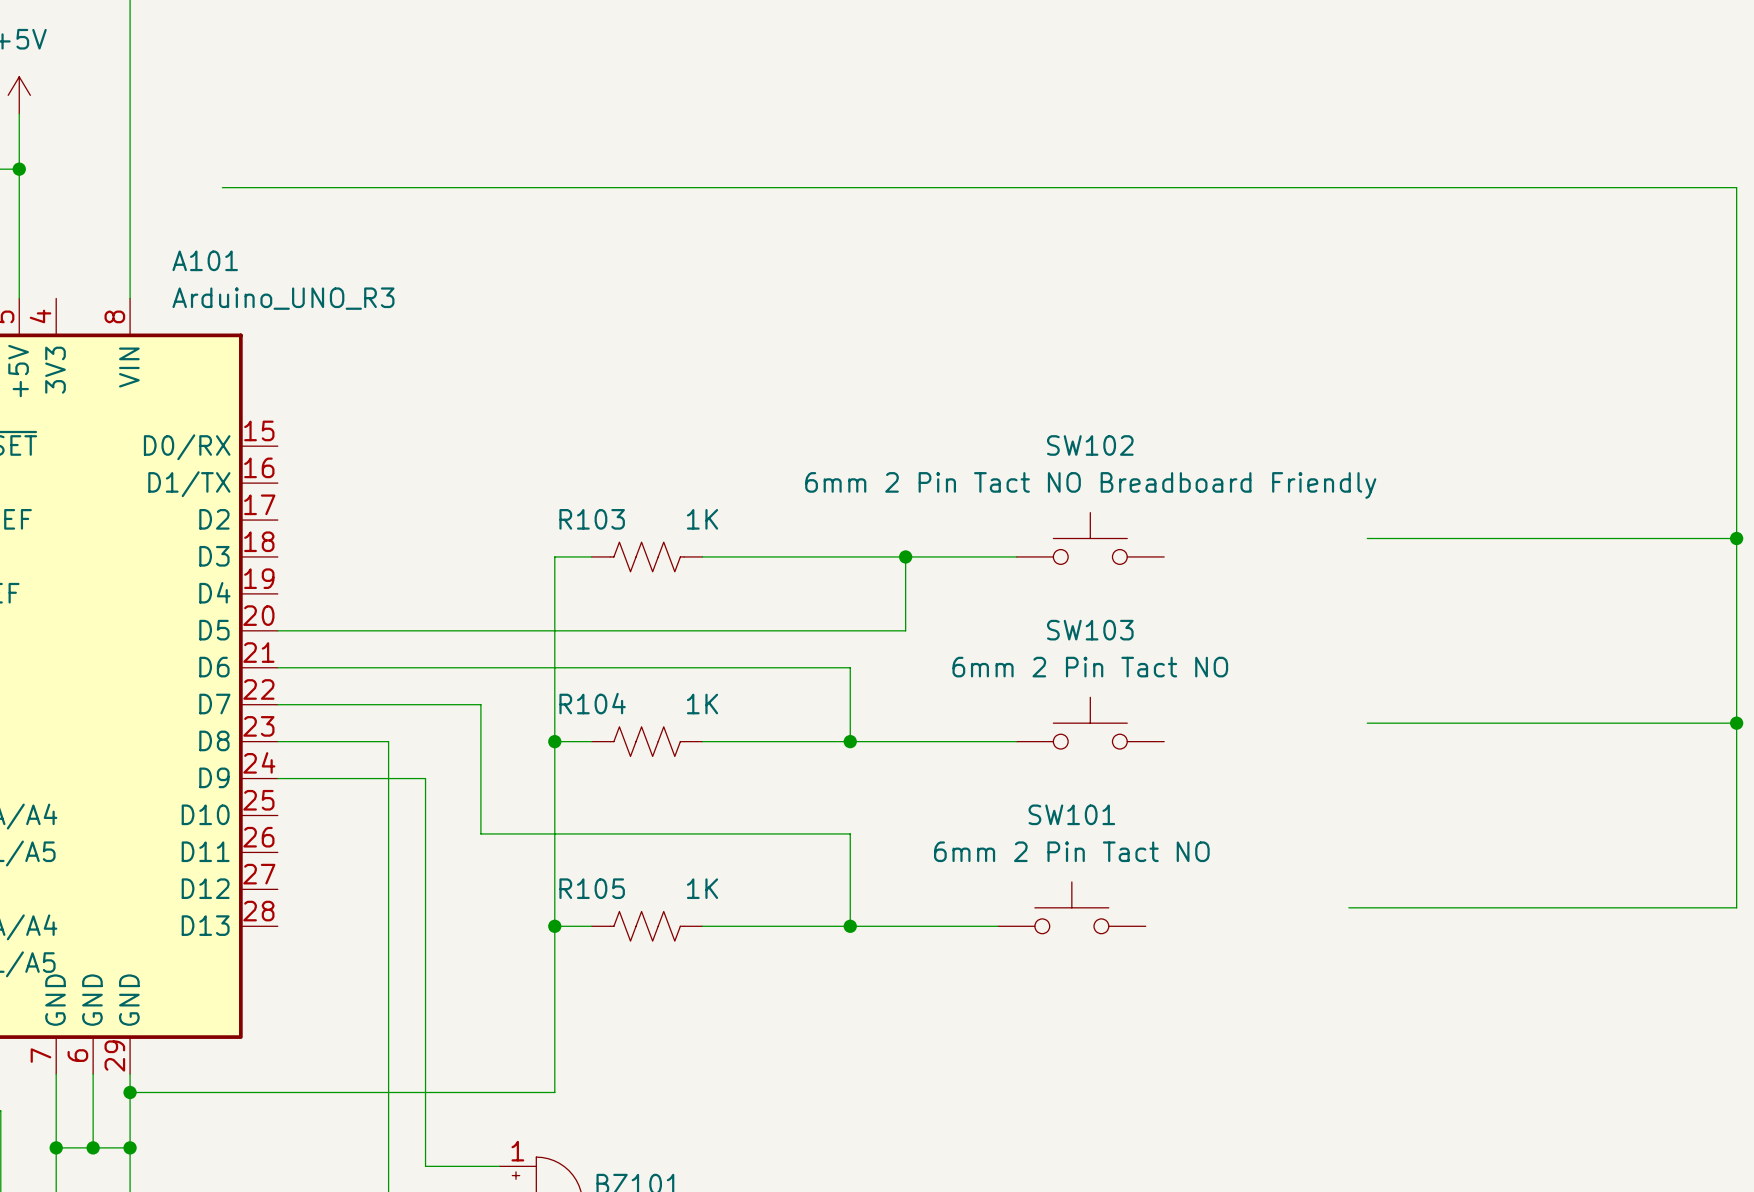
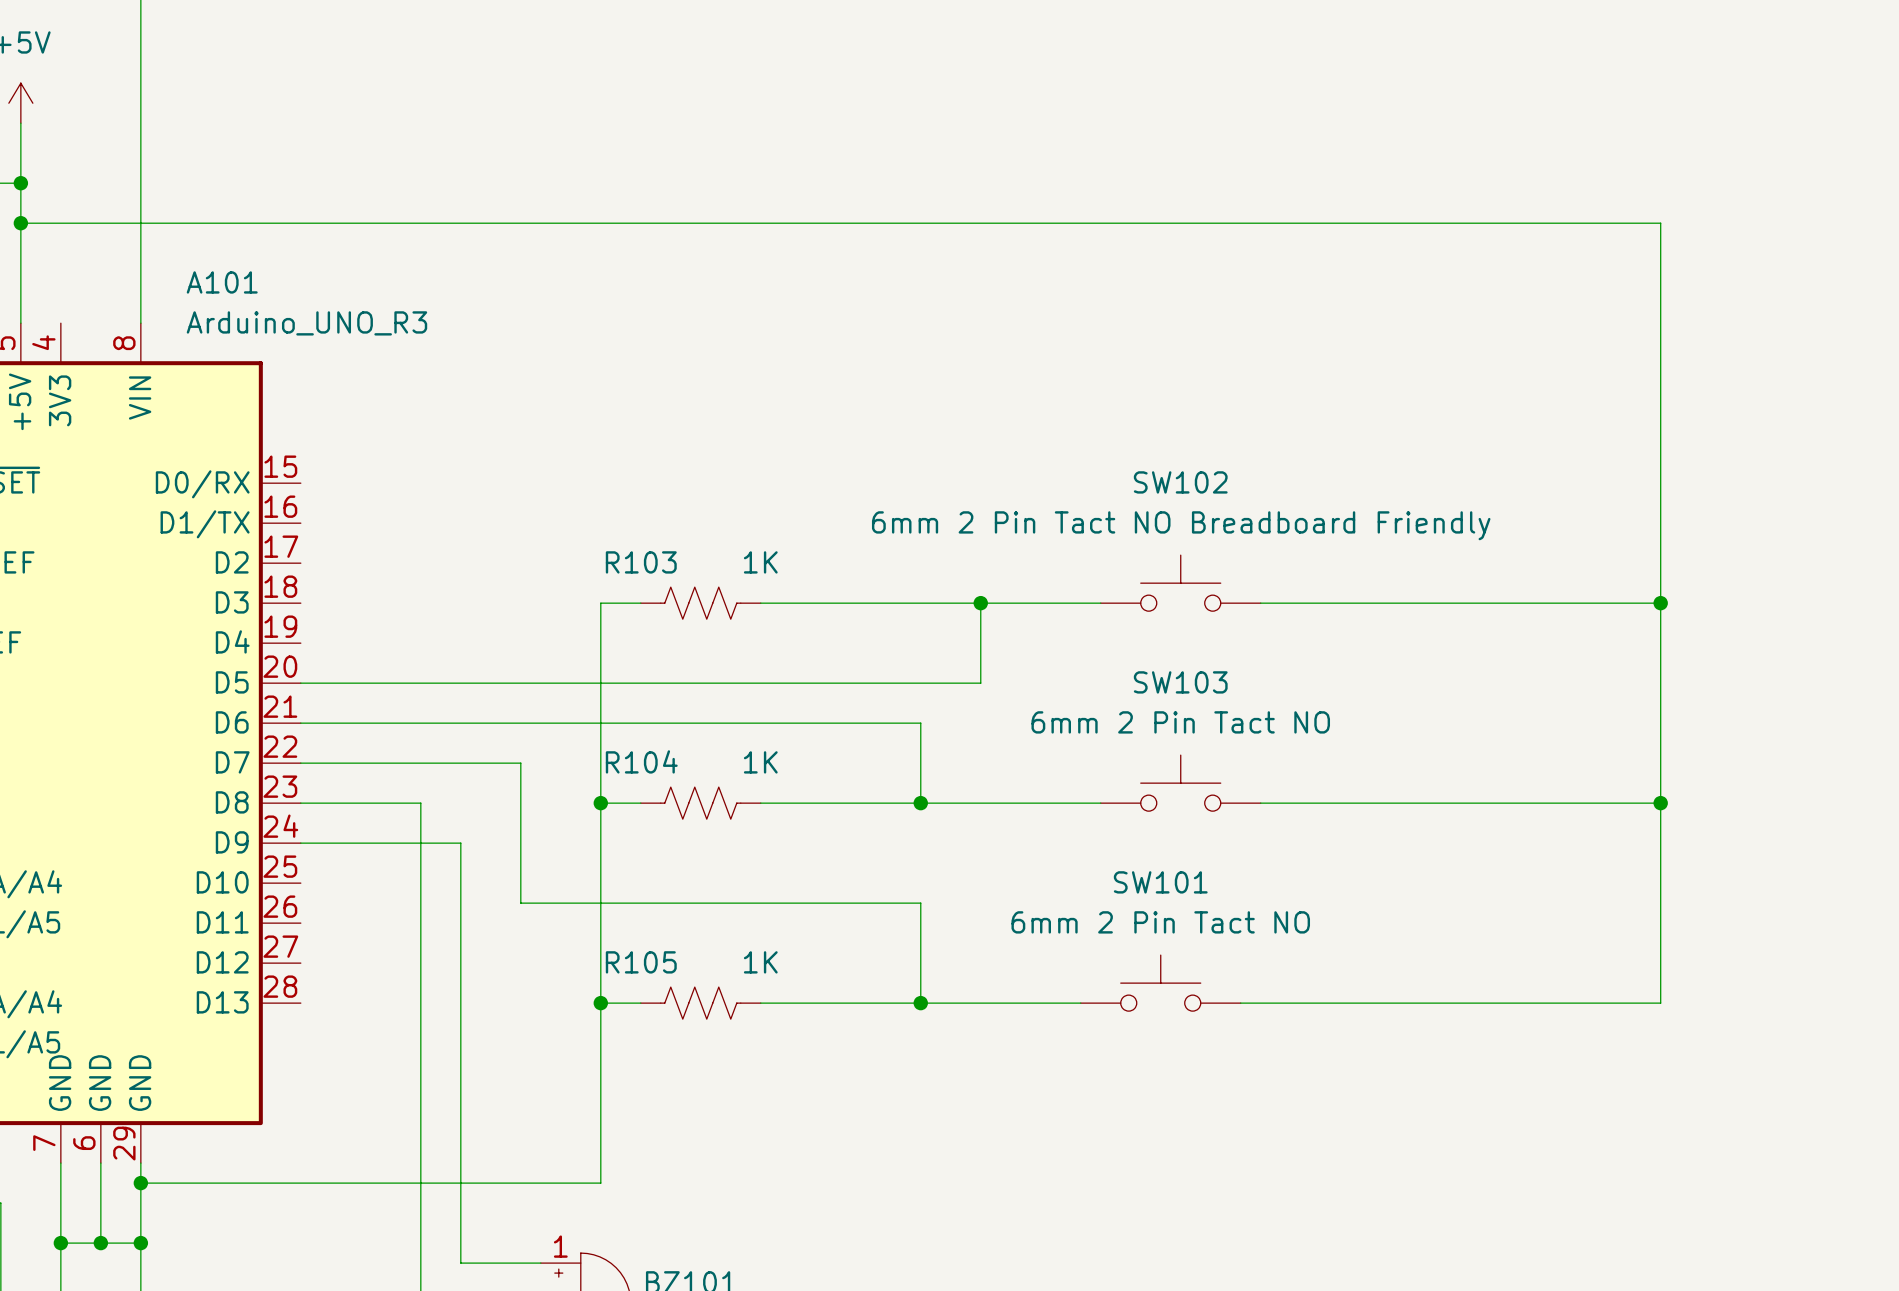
wire: (222, 187) (1736, 187) (1736, 907) (1348, 907) -> (20, 223) (1660, 223) (1660, 1003) (1240, 1003)
junction: none -> (20, 223)
wire: (1367, 538) (1736, 538) -> (1260, 603) (1660, 603)
junction: (1736, 538) -> none
junction: none -> (1660, 603)
wire: (1367, 723) (1736, 723) -> (1260, 803) (1660, 803)
junction: (1736, 723) -> none
junction: none -> (1660, 803)

